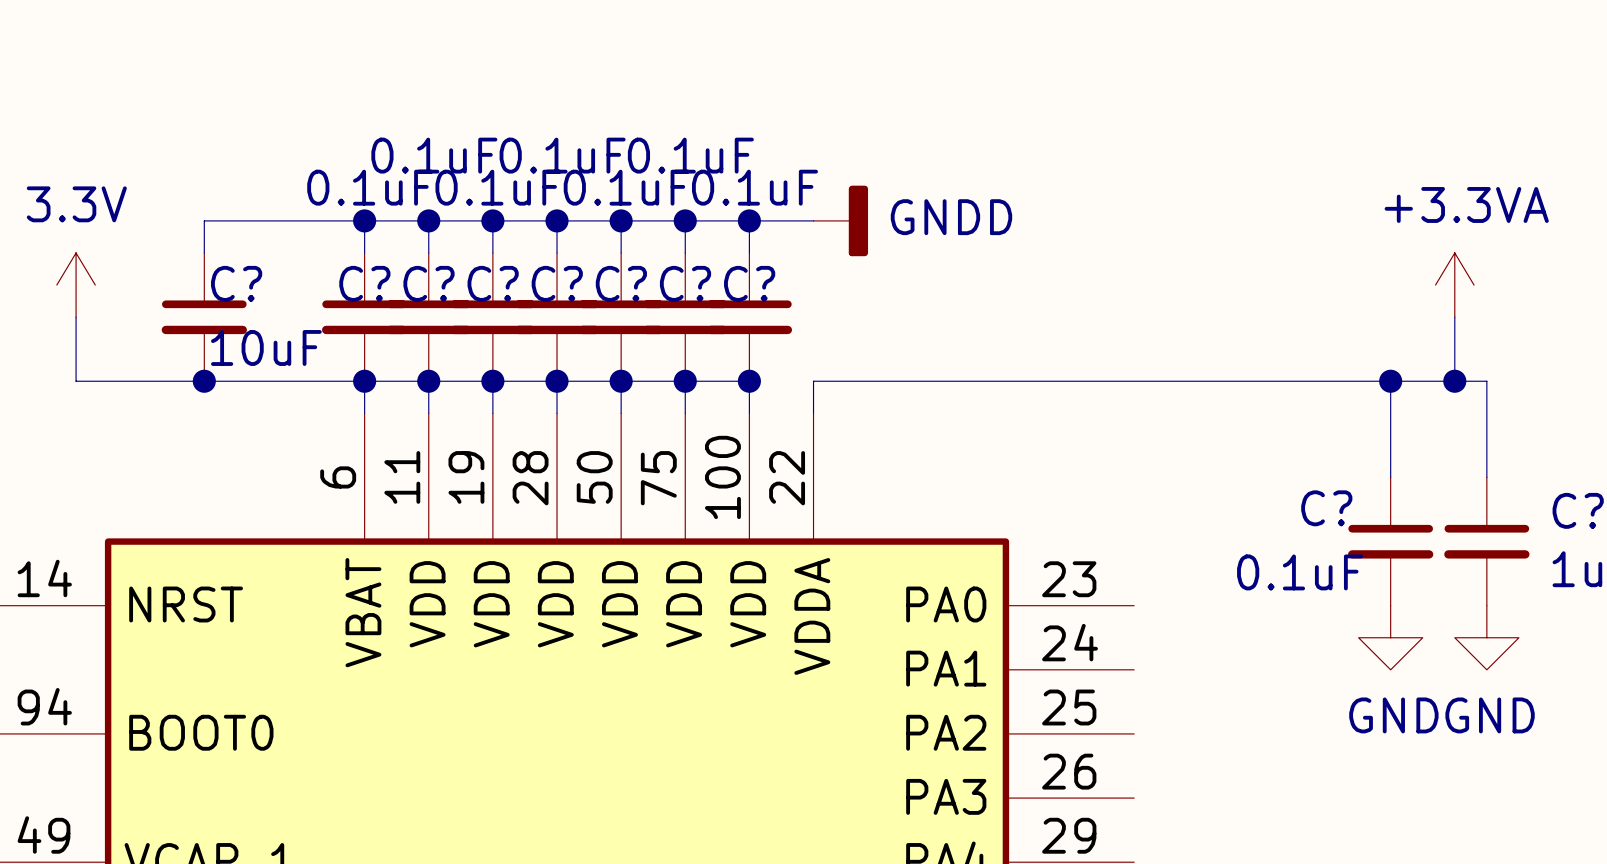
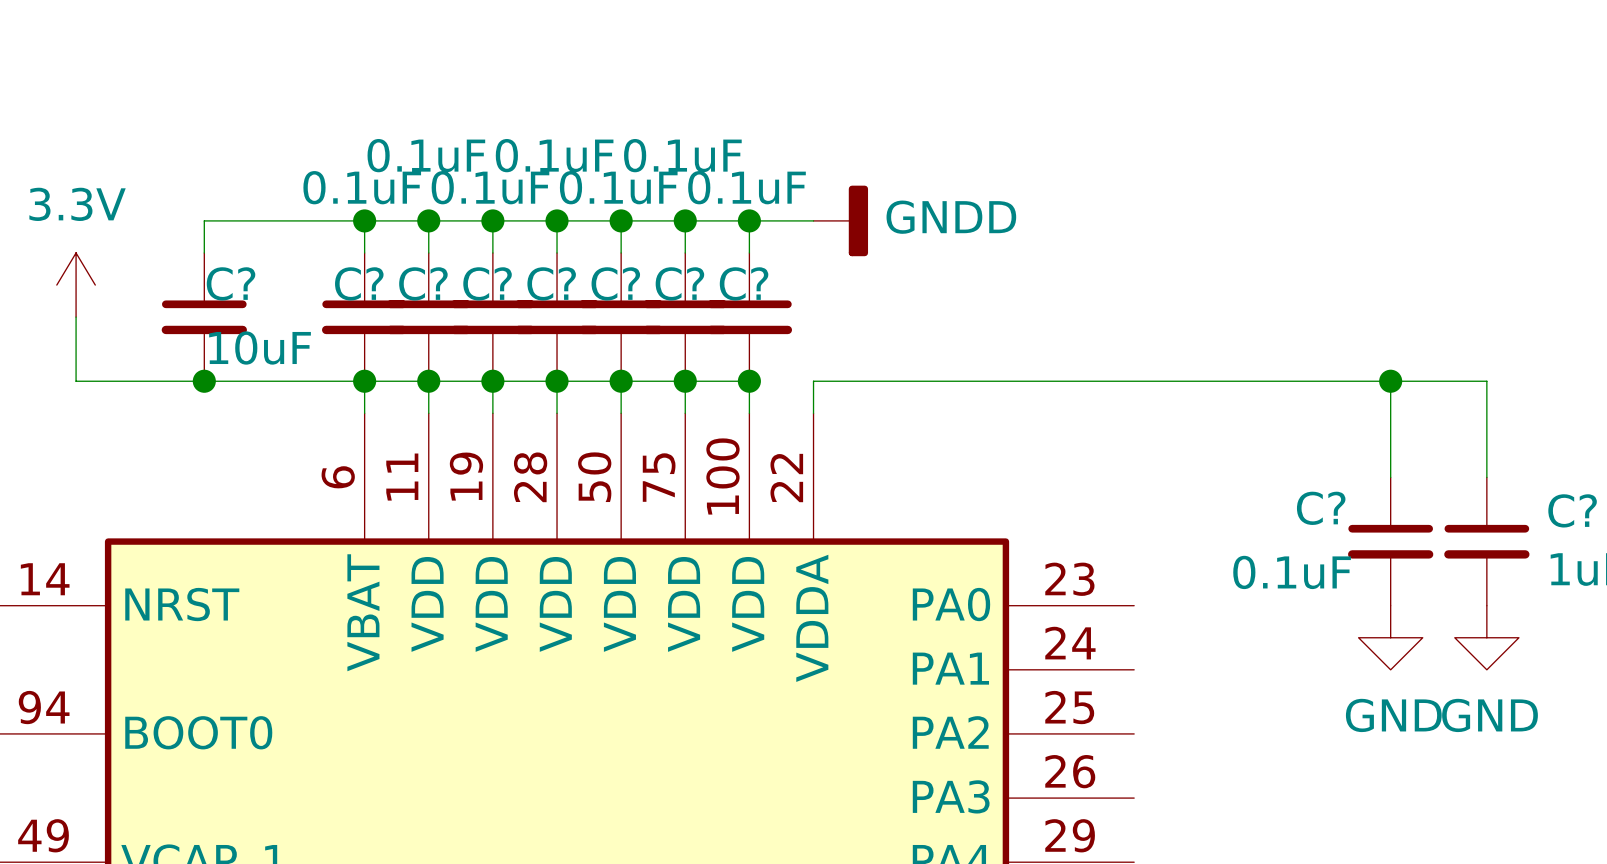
power symbol: +3.3VA (1454, 285) -> none
wire: (1454, 317) (1454, 381) -> none
junction: (1454, 381) -> none

